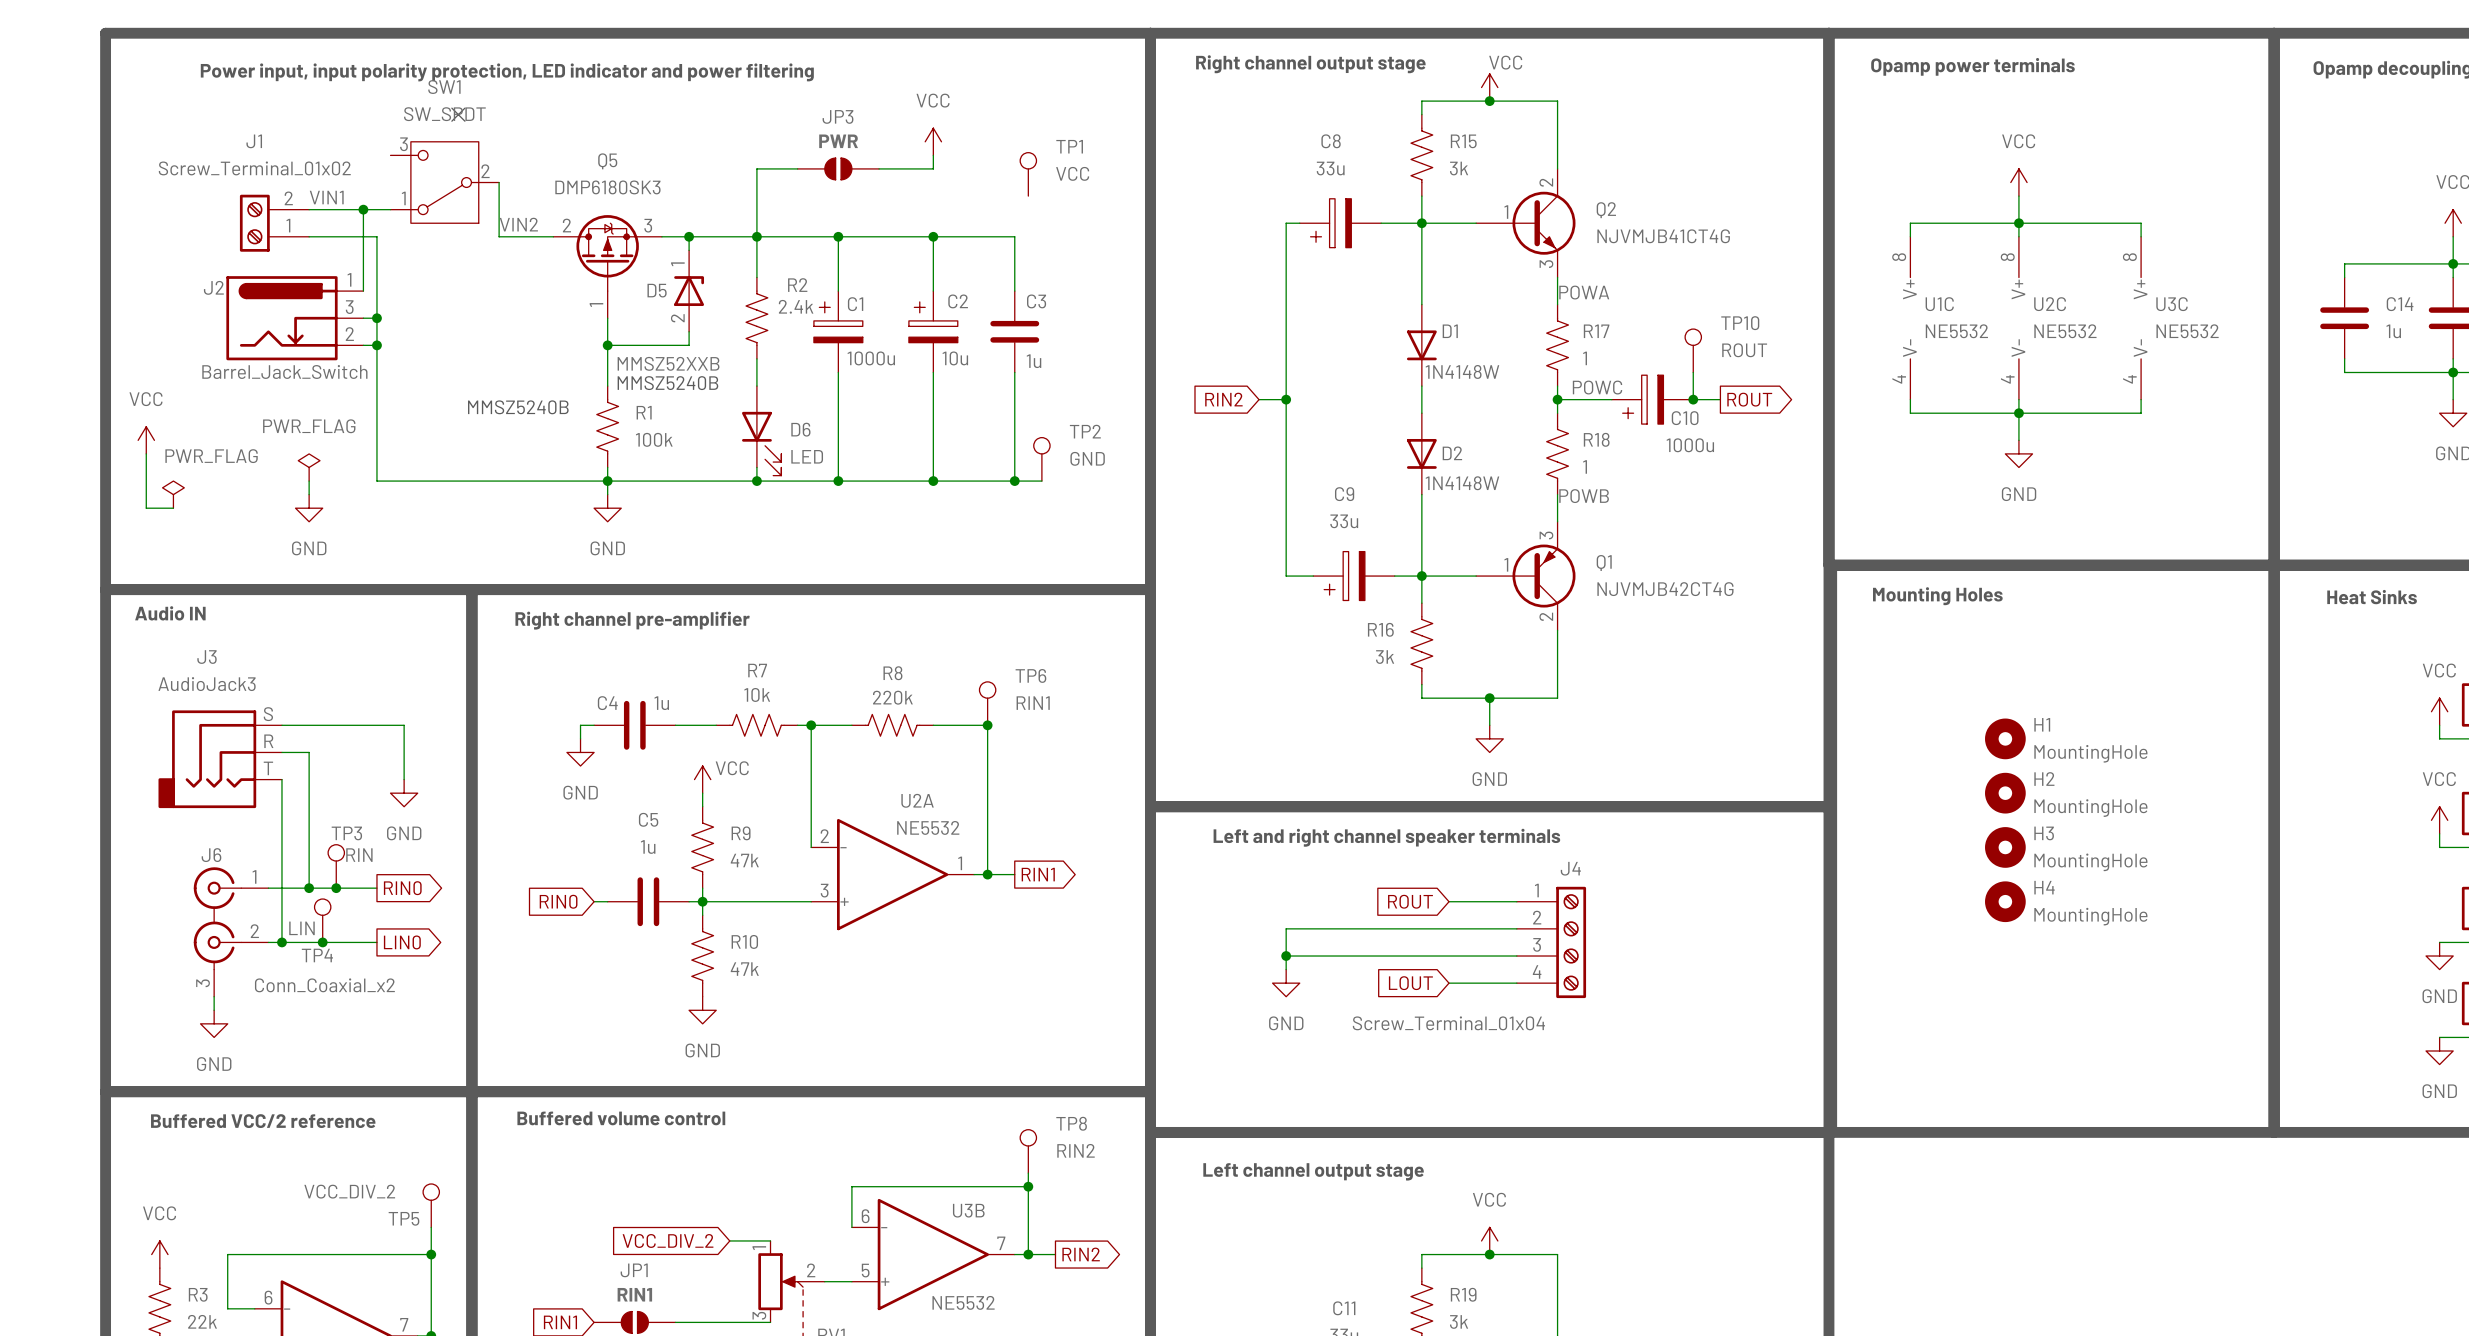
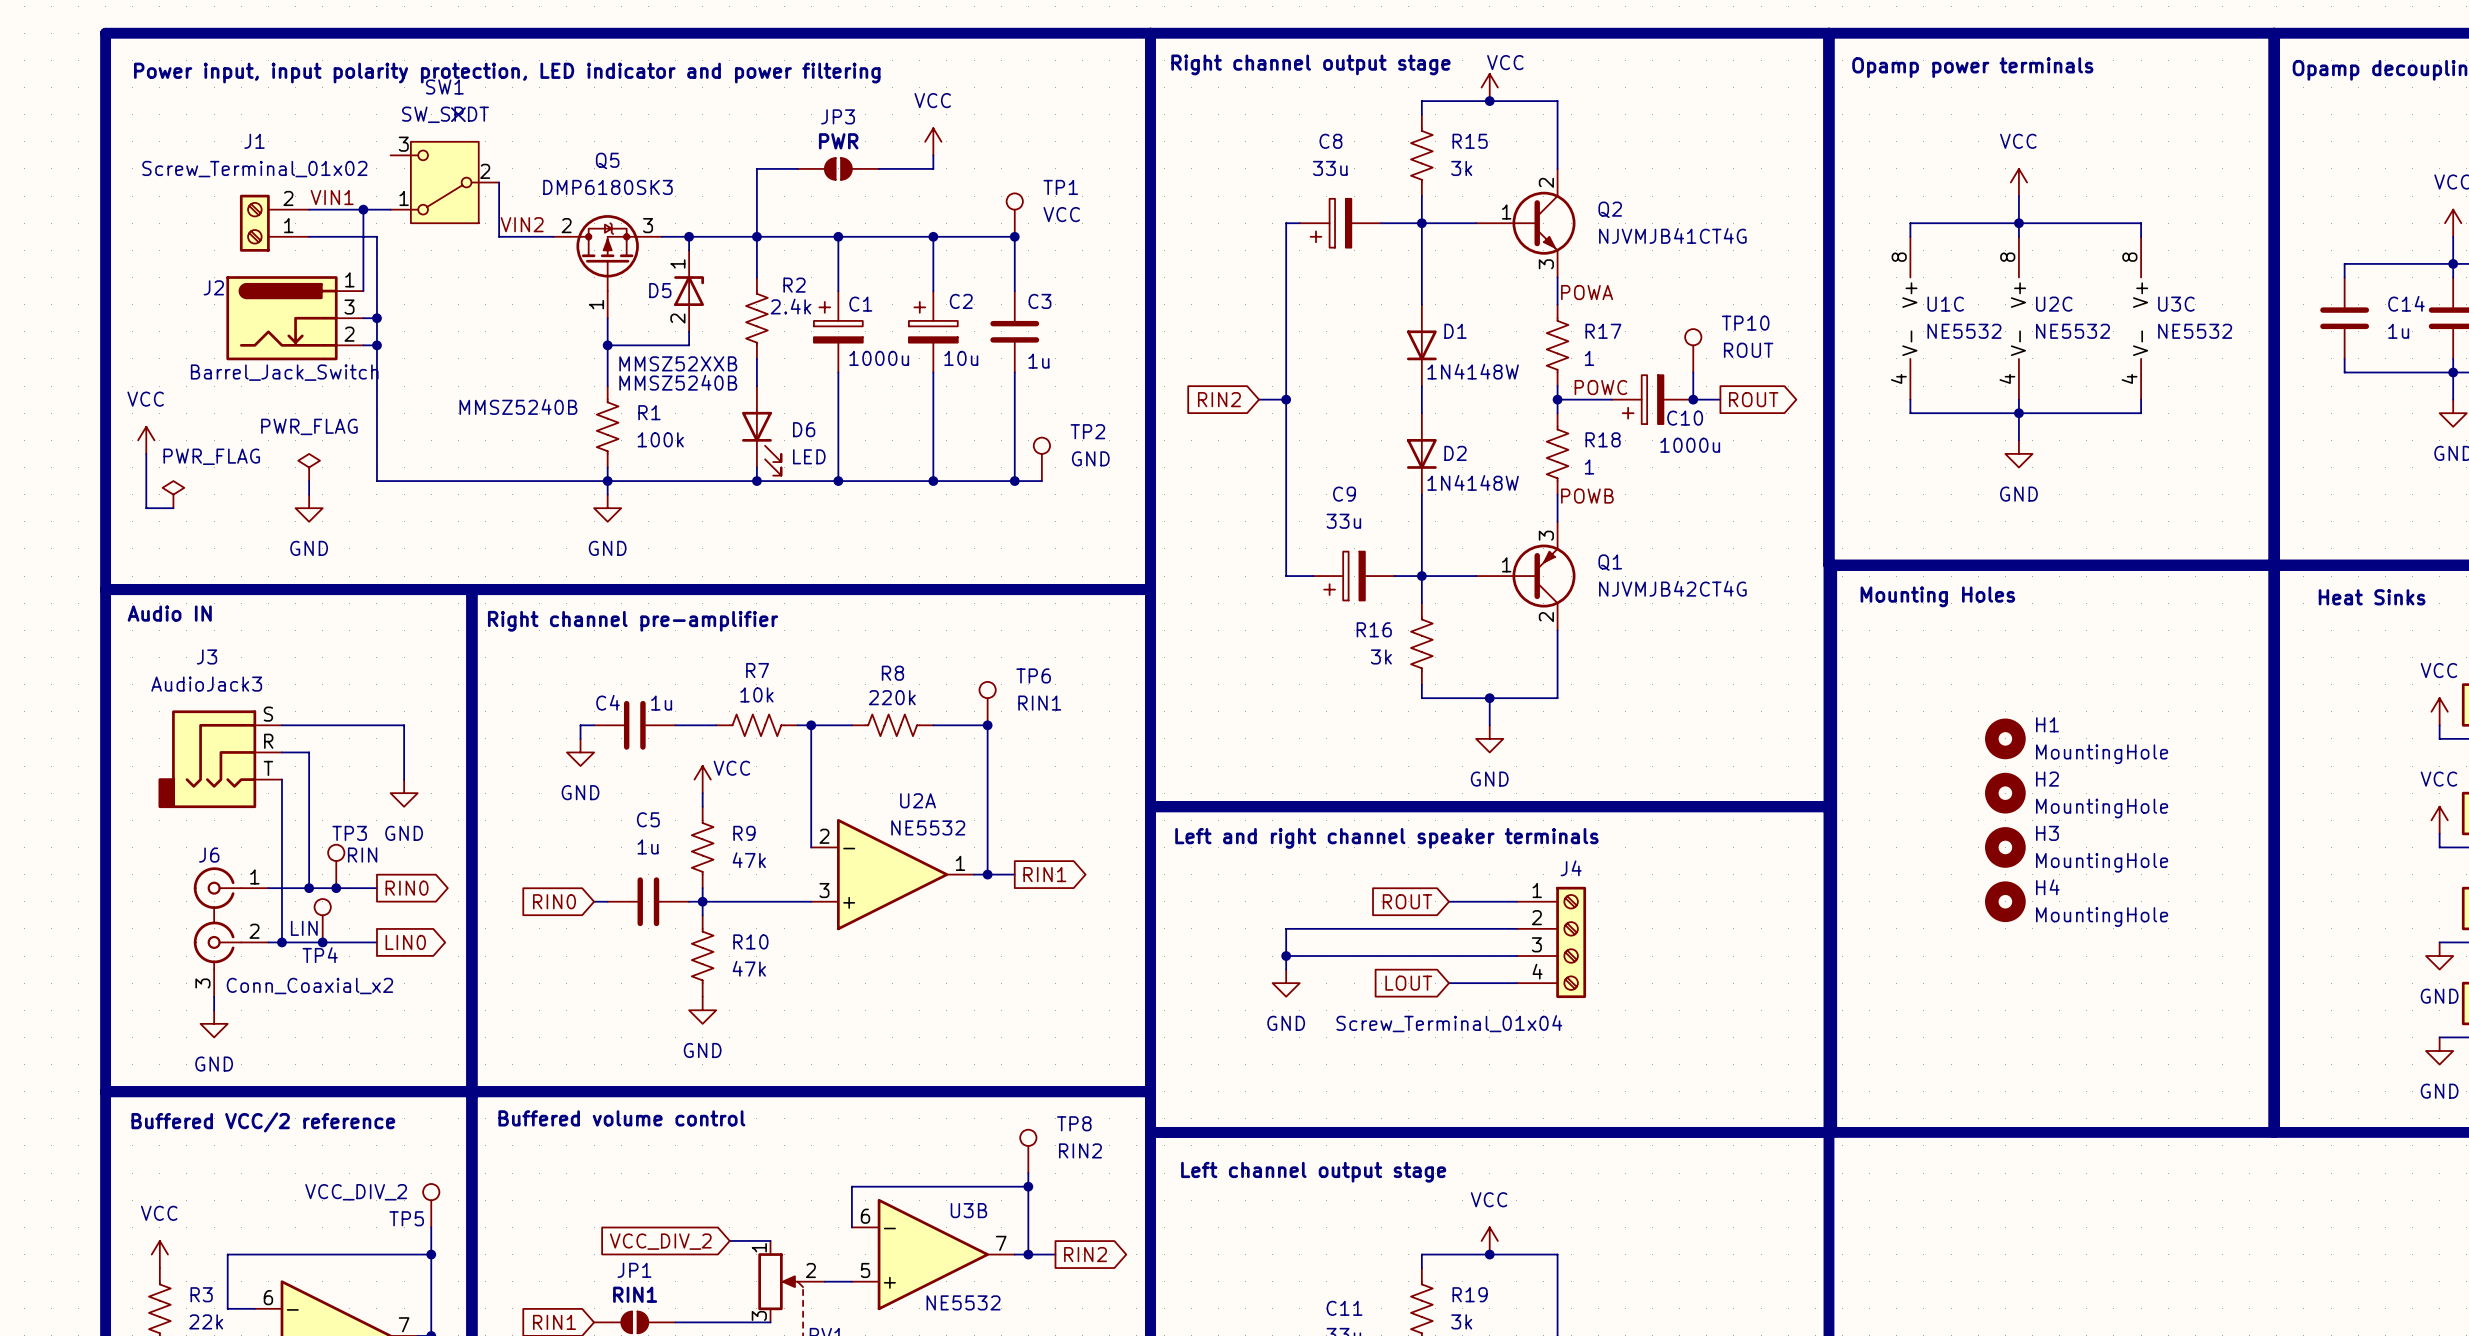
TP1 position: (1028, 174) -> (1014, 215)
junction: none -> (1014, 236)

